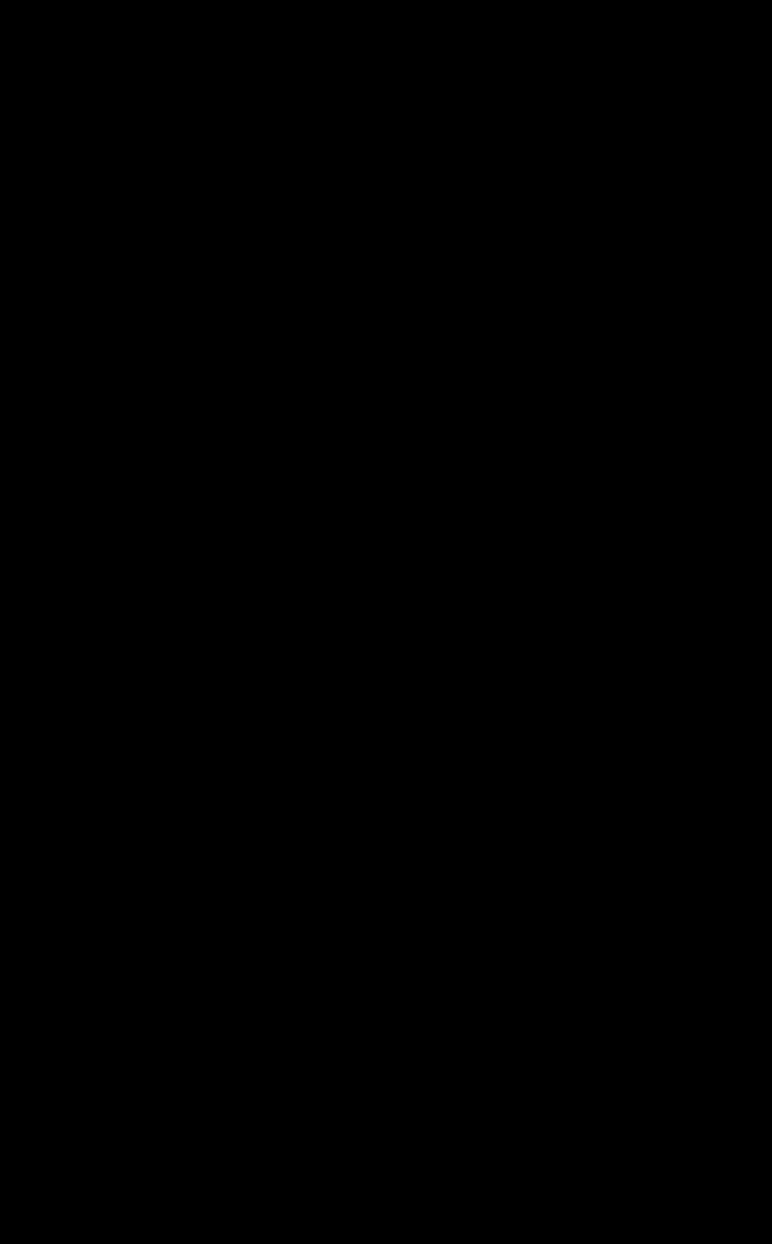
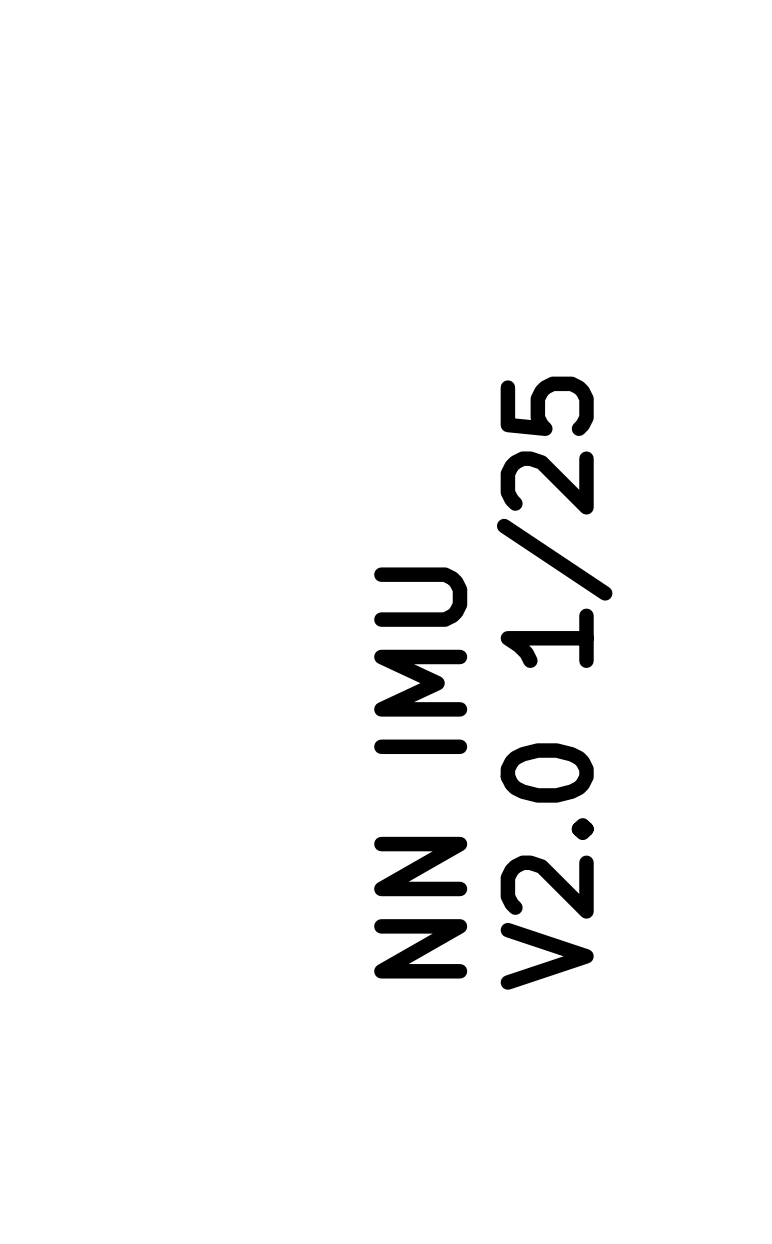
text: none -> V2.0 1/25 (554, 683)
text: none -> NN IMU (420, 772)

